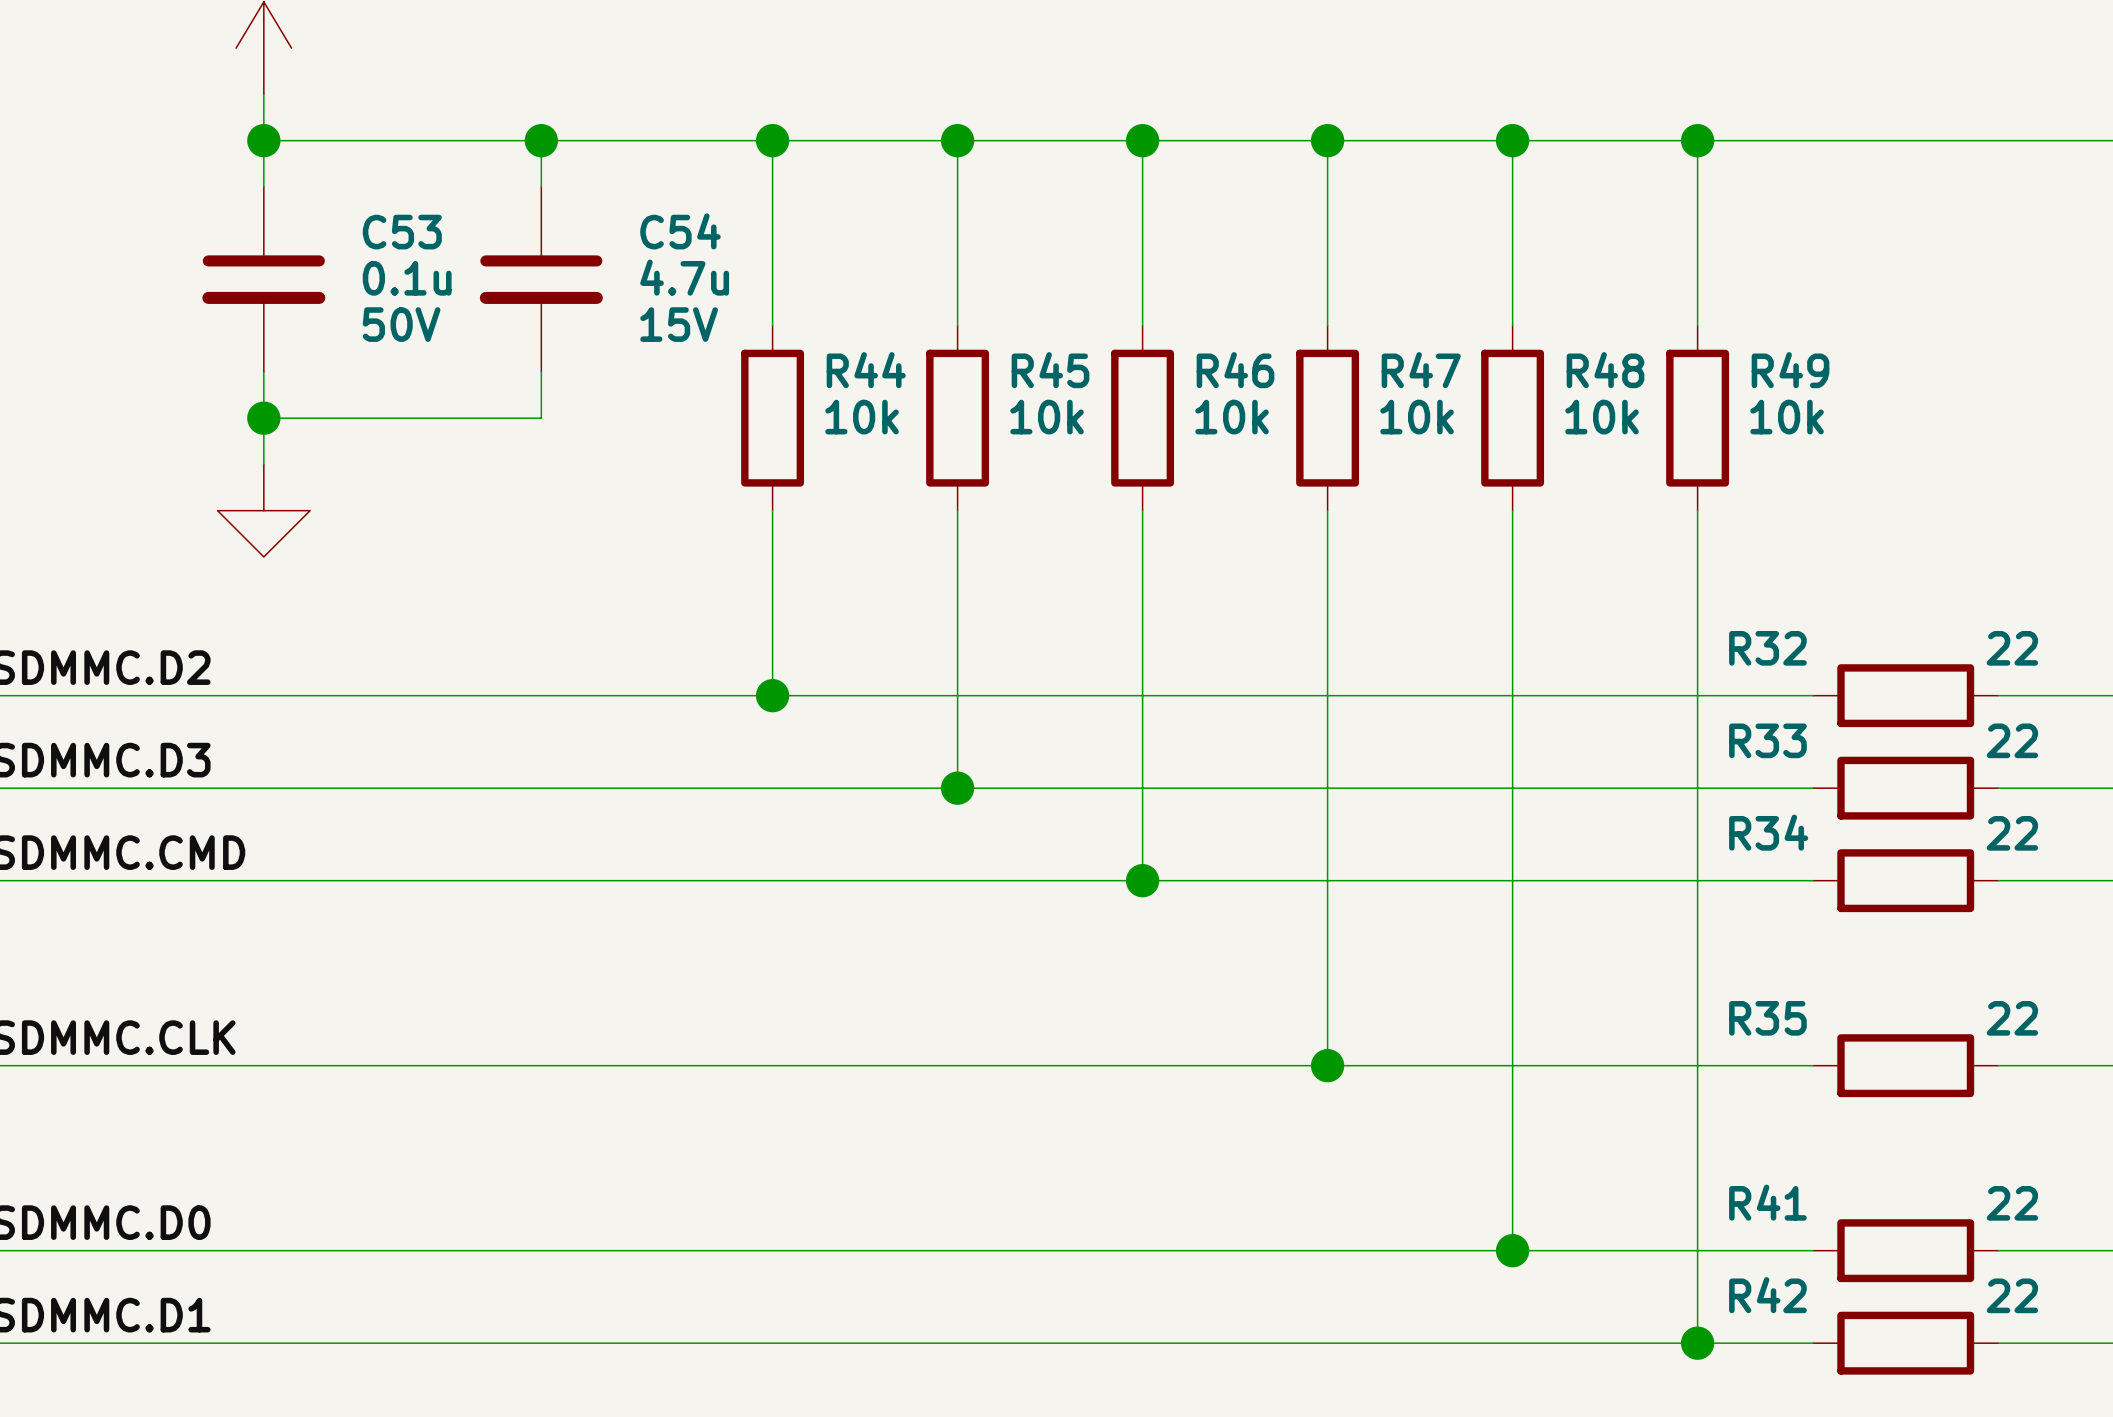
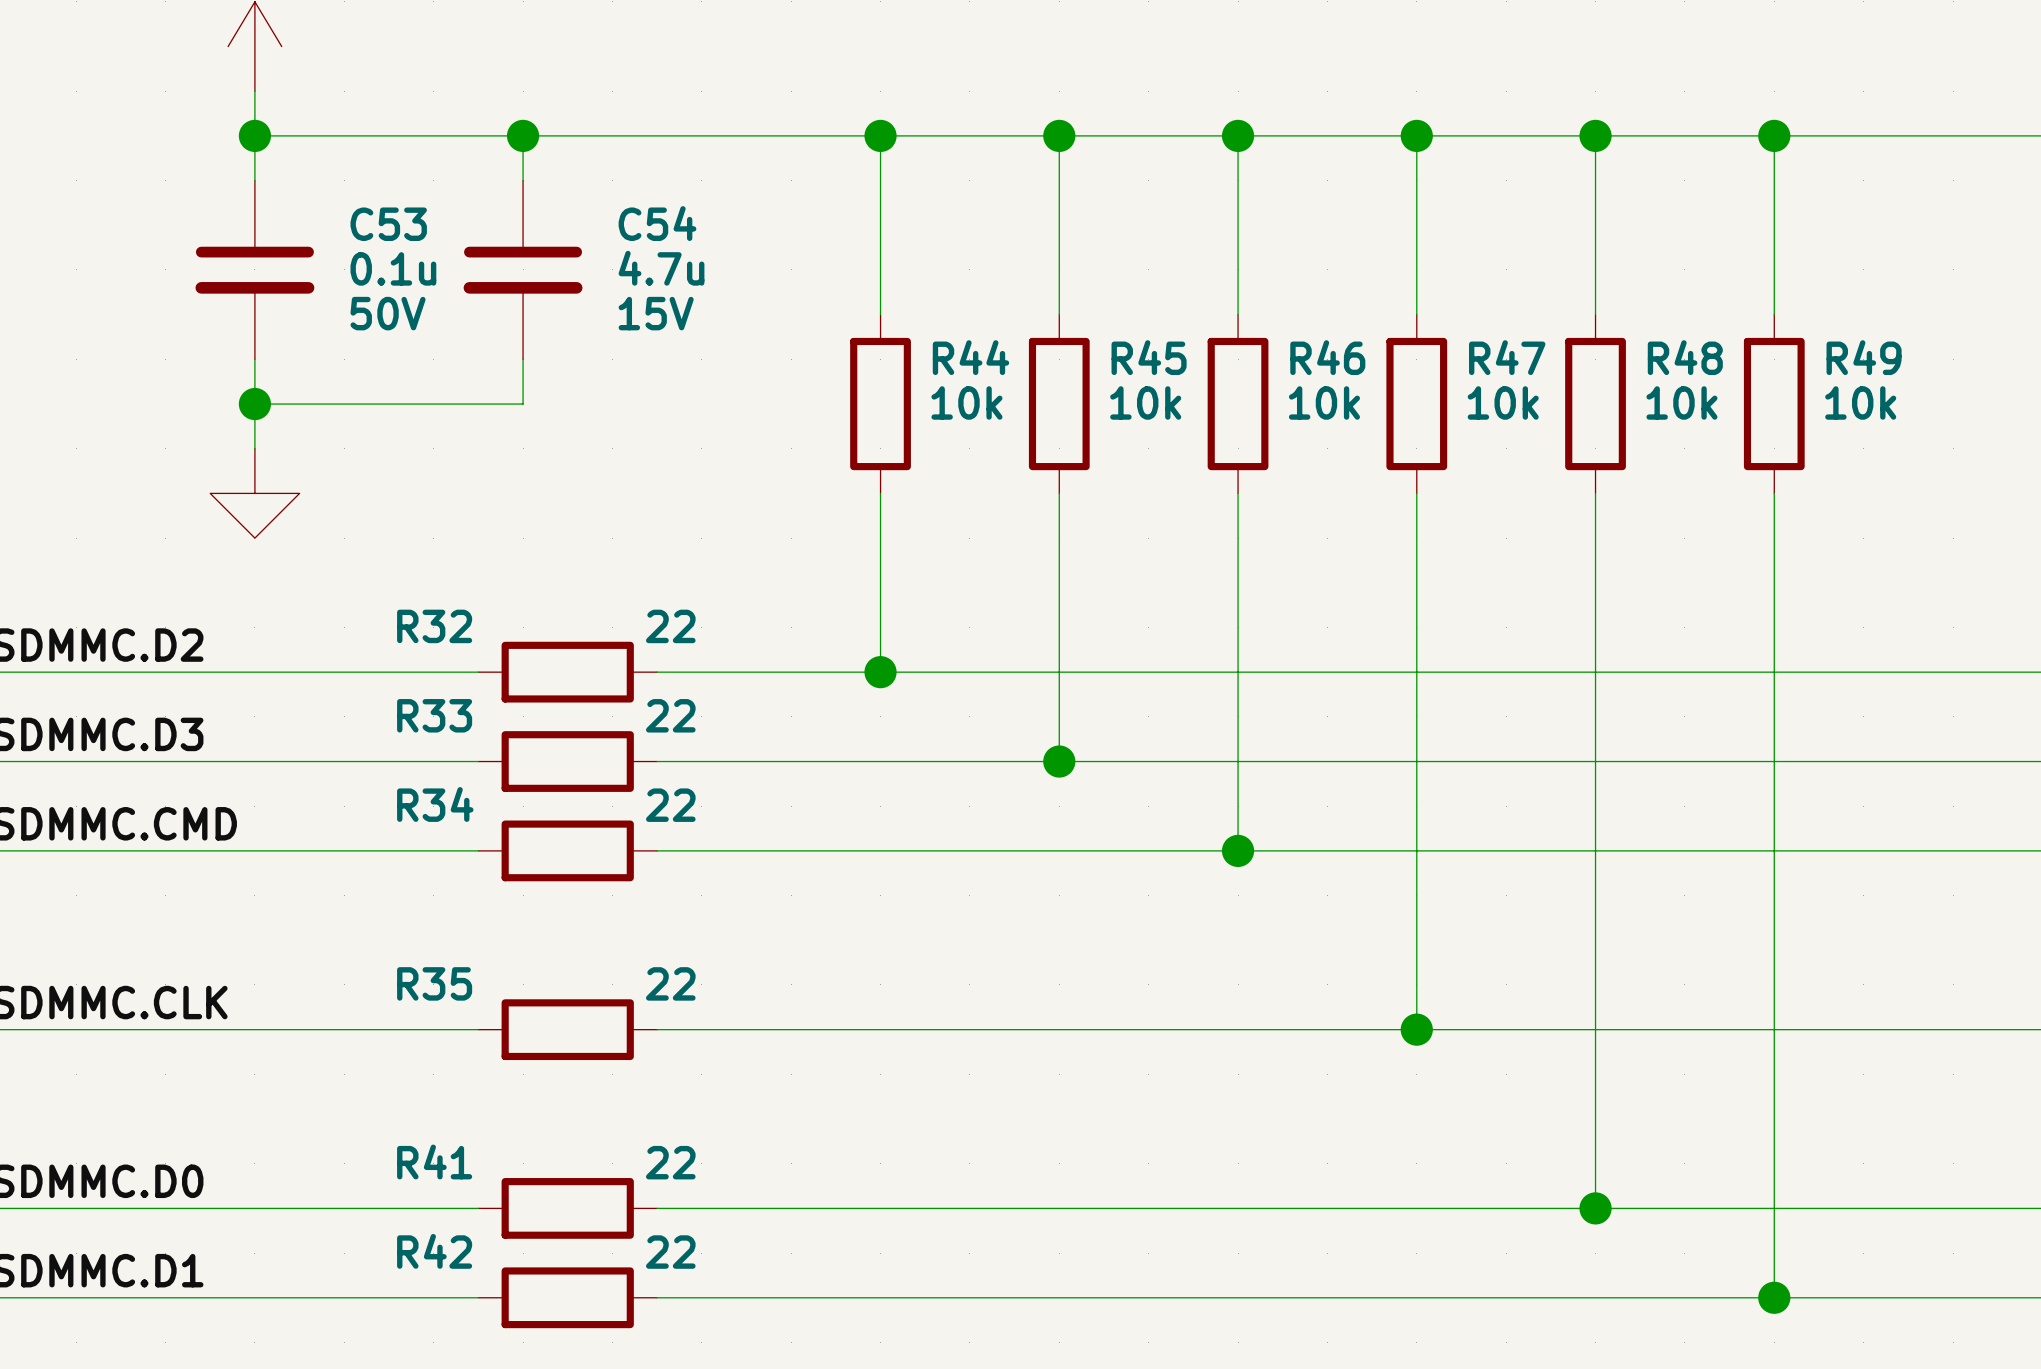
wire: (772, 140) (772, 325) -> (880, 135) (880, 314)
junction: (772, 140) -> none
wire: (957, 140) (957, 325) -> (1059, 135) (1059, 314)
junction position: (957, 140) -> (880, 135)
wire: (1142, 140) (1142, 325) -> (1238, 135) (1238, 314)
junction position: (1142, 140) -> (1059, 135)
wire: (1327, 140) (1327, 325) -> (1416, 135) (1416, 314)
junction position: (1327, 140) -> (1238, 135)
wire: (1512, 140) (1512, 325) -> (1595, 135) (1595, 314)
junction position: (1512, 140) -> (1416, 135)
wire: (1697, 140) (1697, 325) -> (1774, 135) (1774, 314)
junction position: (1697, 140) -> (1595, 135)
junction: none -> (1774, 135)
R44 position: (772, 418) -> (880, 404)
R45 position: (957, 418) -> (1059, 404)
R46 position: (1142, 418) -> (1238, 404)
R47 position: (1327, 418) -> (1416, 404)
R48 position: (1512, 418) -> (1595, 404)
R49 position: (1697, 418) -> (1774, 404)
wire: (772, 510) (772, 695) -> (880, 493) (880, 672)
wire: (957, 510) (957, 788) -> (1059, 493) (1059, 761)
wire: (1142, 510) (1142, 880) -> (1238, 493) (1238, 850)
wire: (1327, 510) (1327, 1065) -> (1416, 493) (1416, 1029)
wire: (1512, 510) (1512, 1250) -> (1595, 493) (1595, 1208)
wire: (1697, 510) (1697, 1343) -> (1774, 493) (1774, 1297)
wire: (495, 695) (680, 695) -> none
junction: (772, 695) -> none
junction: none -> (880, 672)
wire: none -> (1751, 672) (1930, 672)
R32 position: (1905, 695) -> (567, 672)
wire: (495, 788) (680, 788) -> none
junction: (957, 788) -> none
junction: none -> (1059, 761)
wire: none -> (1751, 761) (1930, 761)
R33 position: (1905, 788) -> (567, 761)
wire: (495, 880) (680, 880) -> none
junction: (1142, 880) -> none
junction: none -> (1238, 850)
wire: none -> (1751, 850) (1930, 850)
R34 position: (1905, 880) -> (567, 850)
wire: (495, 1065) (680, 1065) -> none
junction: (1327, 1065) -> none
junction: none -> (1416, 1029)
wire: none -> (1751, 1029) (1930, 1029)
R35 position: (1905, 1065) -> (567, 1029)
wire: (495, 1250) (680, 1250) -> none
junction: (1512, 1250) -> none
junction: none -> (1595, 1208)
wire: none -> (1751, 1208) (1930, 1208)
R41 position: (1905, 1250) -> (567, 1208)
wire: (495, 1343) (680, 1343) -> none
junction: (1697, 1343) -> none
wire: none -> (1751, 1297) (1930, 1297)
junction: none -> (1774, 1297)
R42 position: (1905, 1343) -> (567, 1297)

